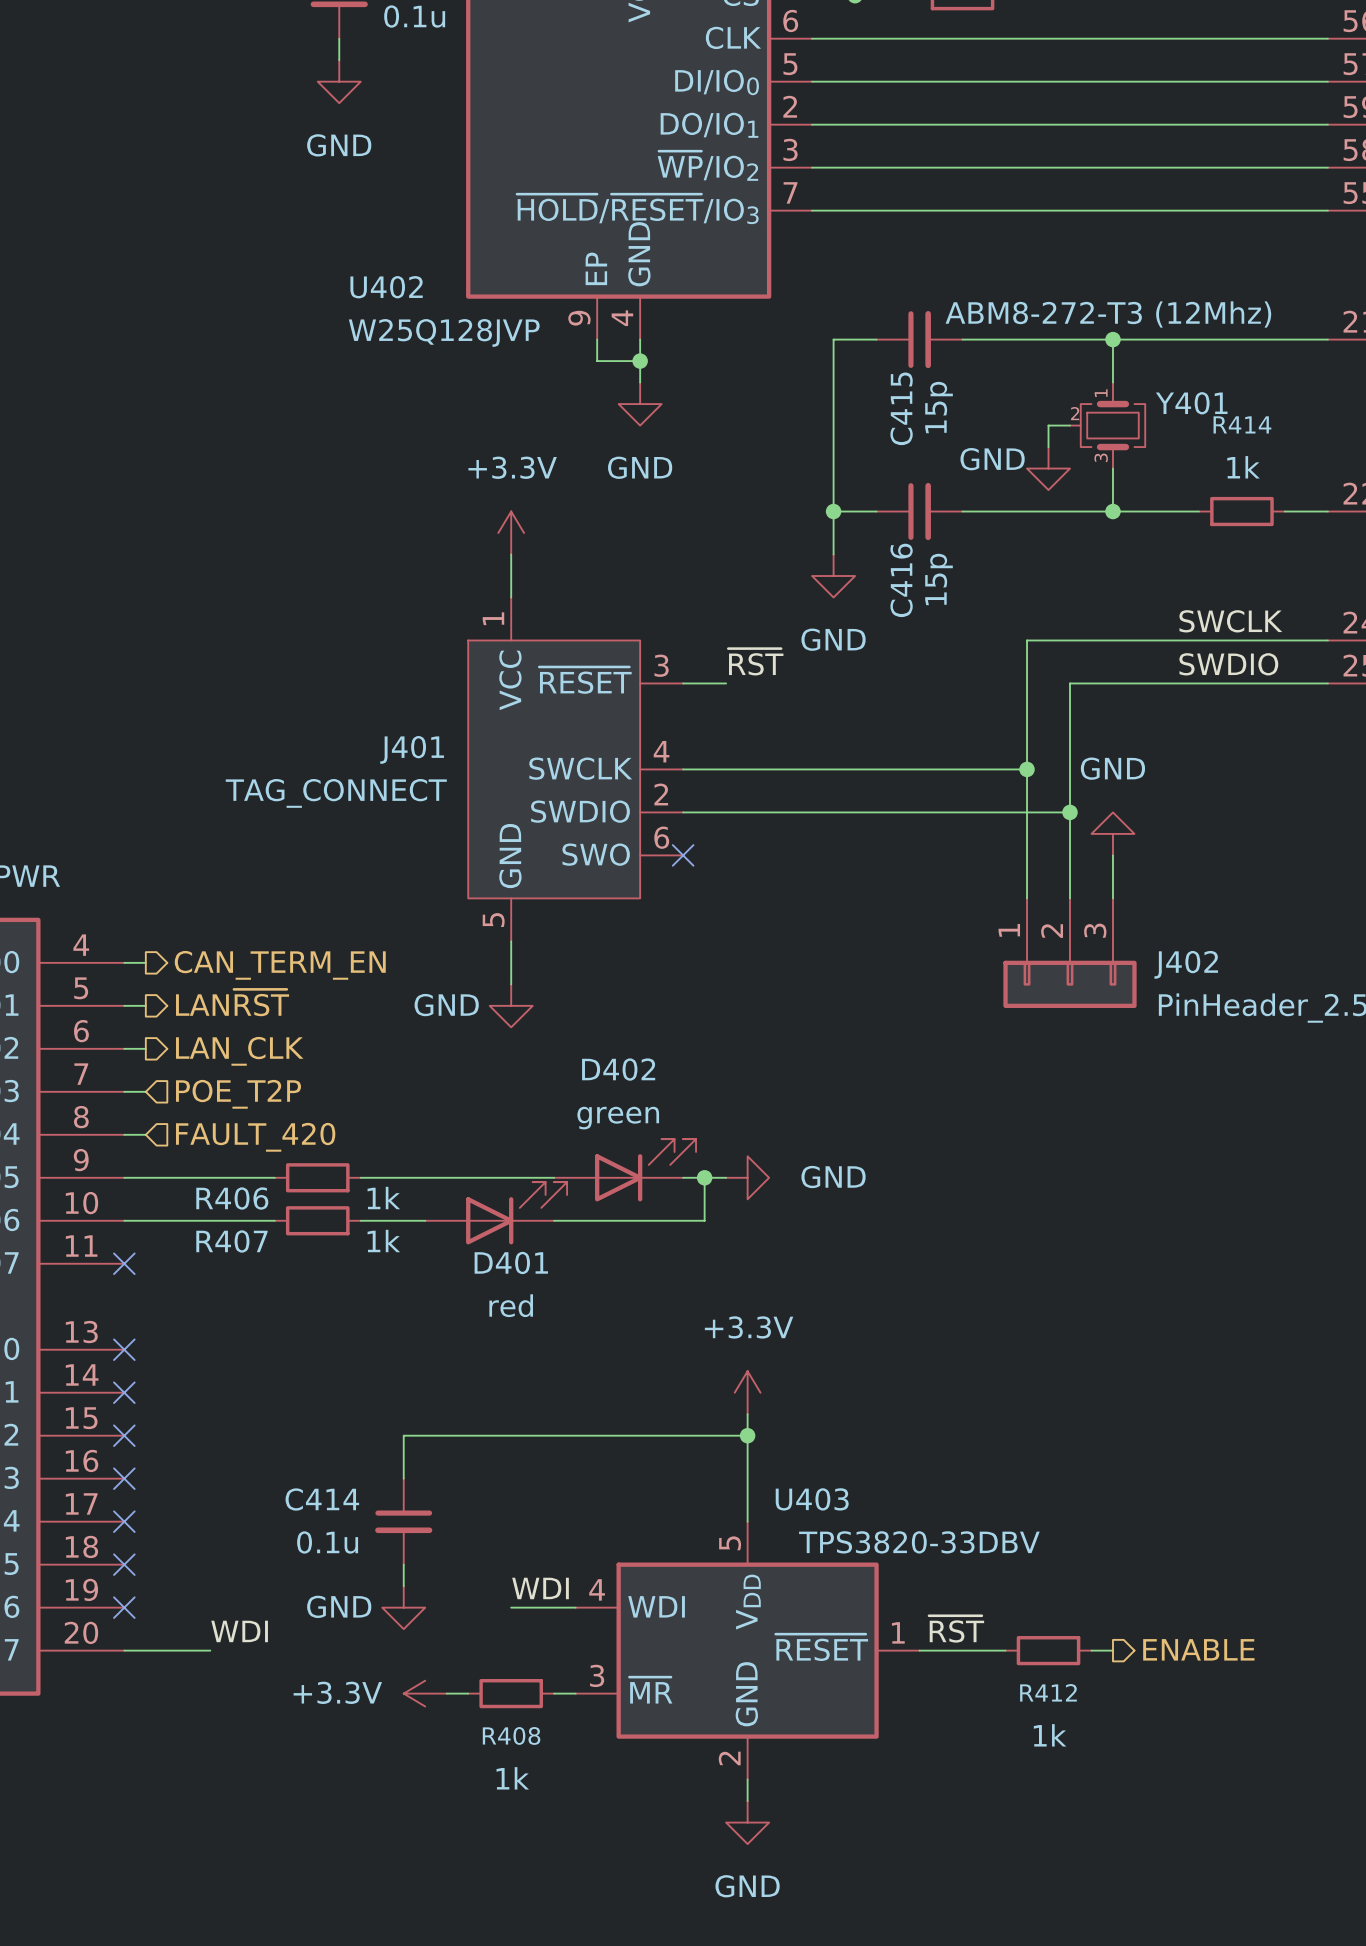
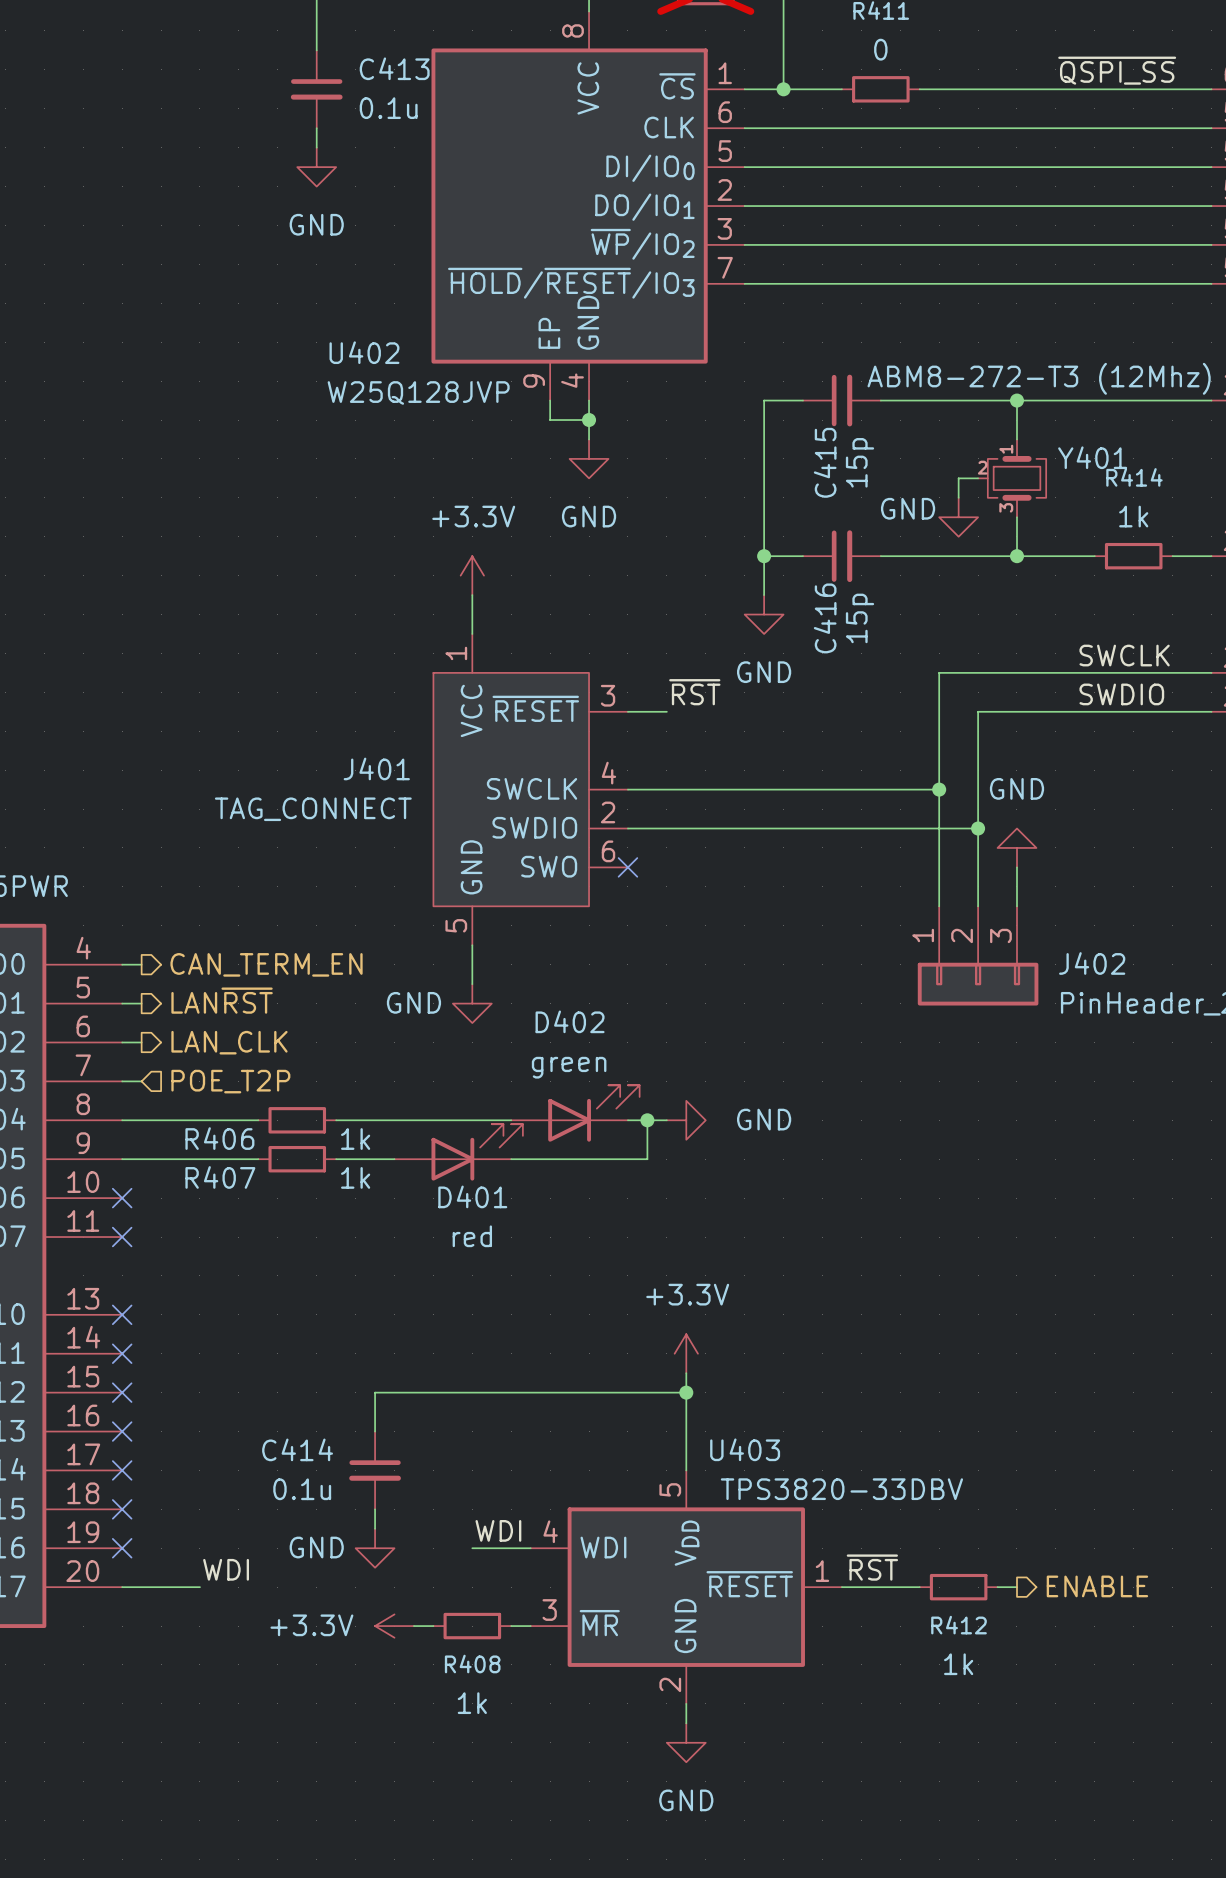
wire: none -> (141, 1120) (258, 1120)
R406: none -> 1k (297, 1120)
wire: none -> (336, 1120) (511, 1120)
wire: none -> (627, 1120) (666, 1120)
wire: none -> (647, 1120) (647, 1159)
hierarchical label: FAULT_420 (255, 1137) -> none
D402 position: (625, 1170) -> (575, 1113)
junction position: (704, 1177) -> (647, 1120)
wire: (726, 1177) (704, 1177) (704, 1220) (554, 1220) -> none
power symbol position: GND (747, 1177) -> GND (686, 1120)
R406 name: R406 (232, 1198) -> R407 (220, 1177)
D401 position: (496, 1213) -> (458, 1152)
wire: (124, 1220) (274, 1220) -> none
no-connect mark: none -> (122, 1198)
R407: 1k (317, 1220) -> none
wire: (360, 1220) (425, 1220) -> none

